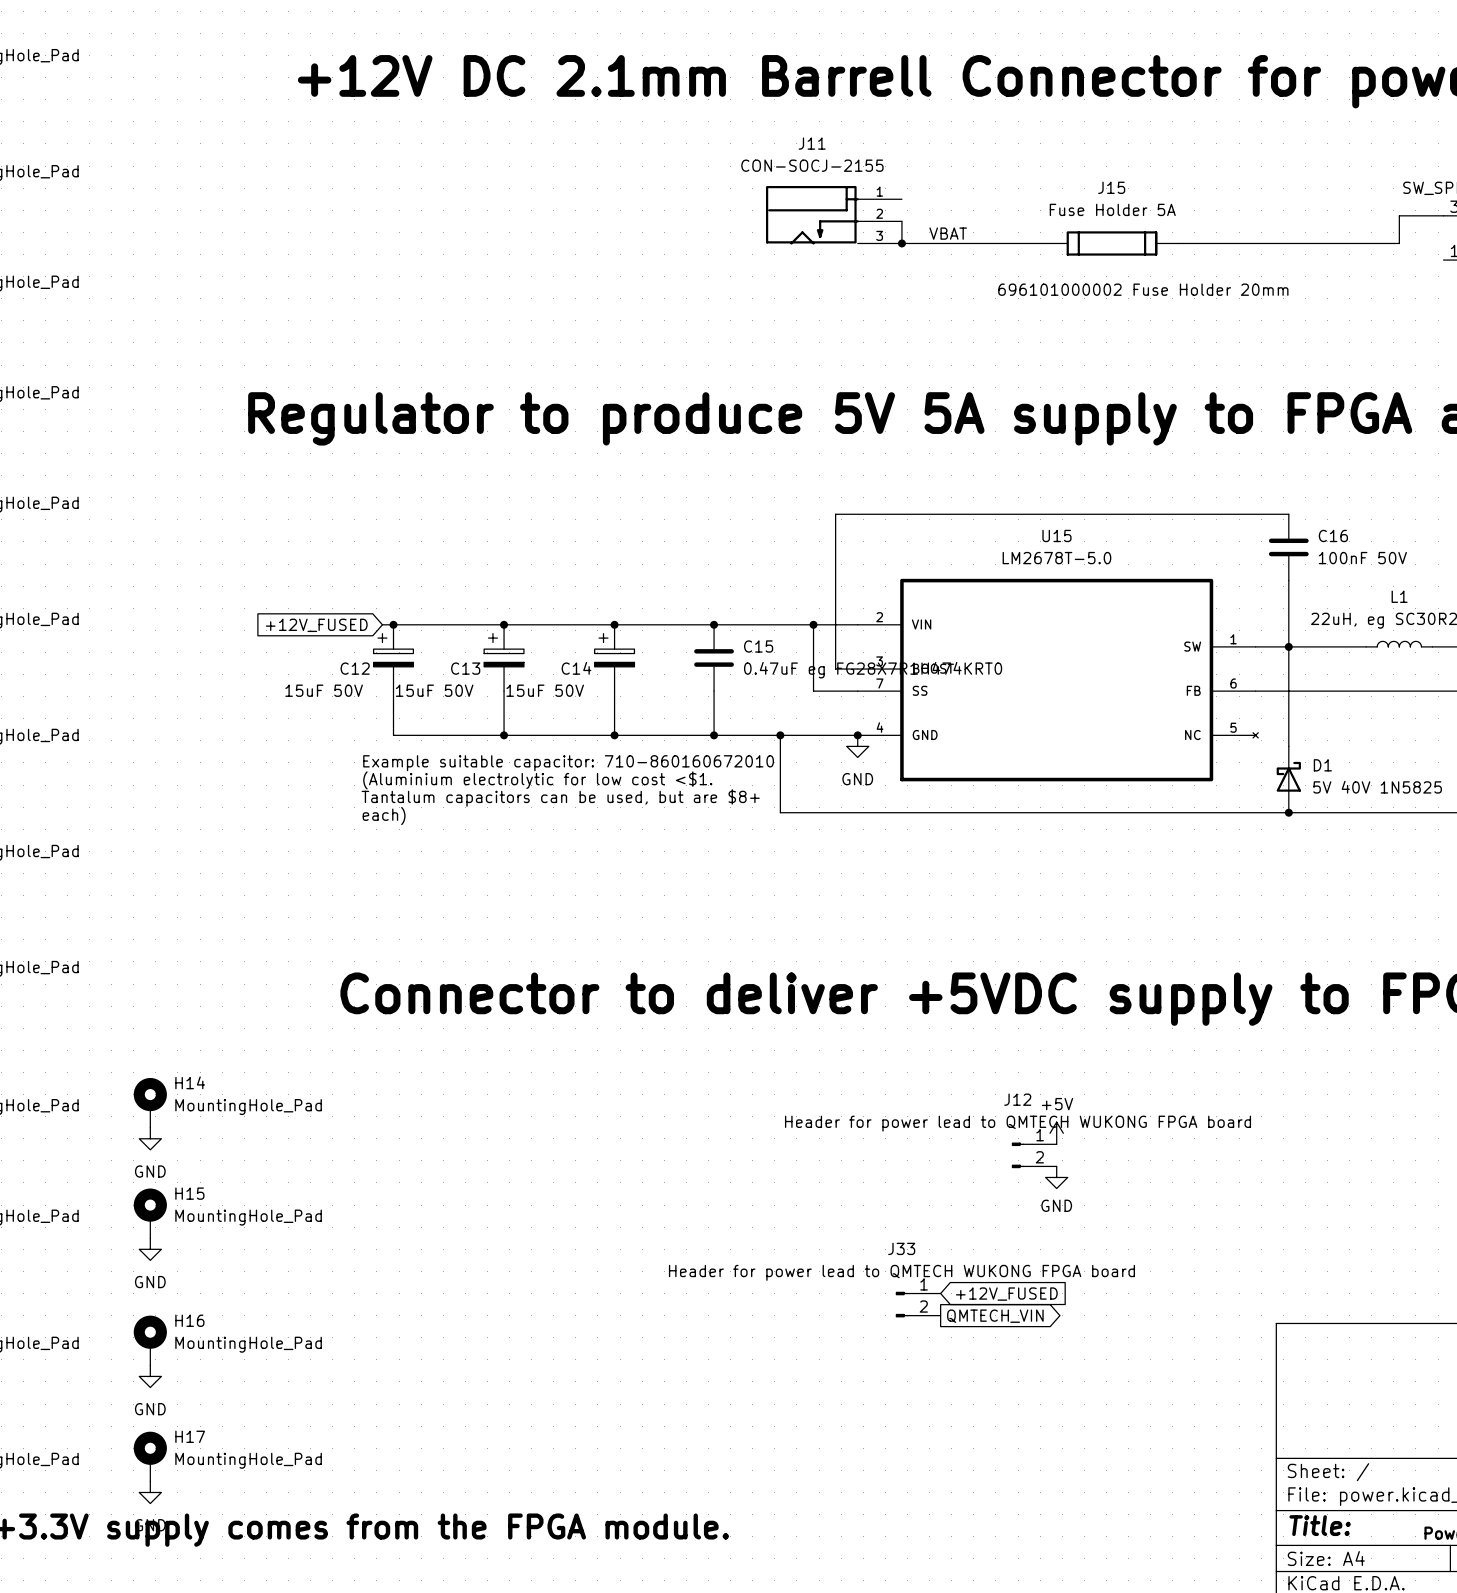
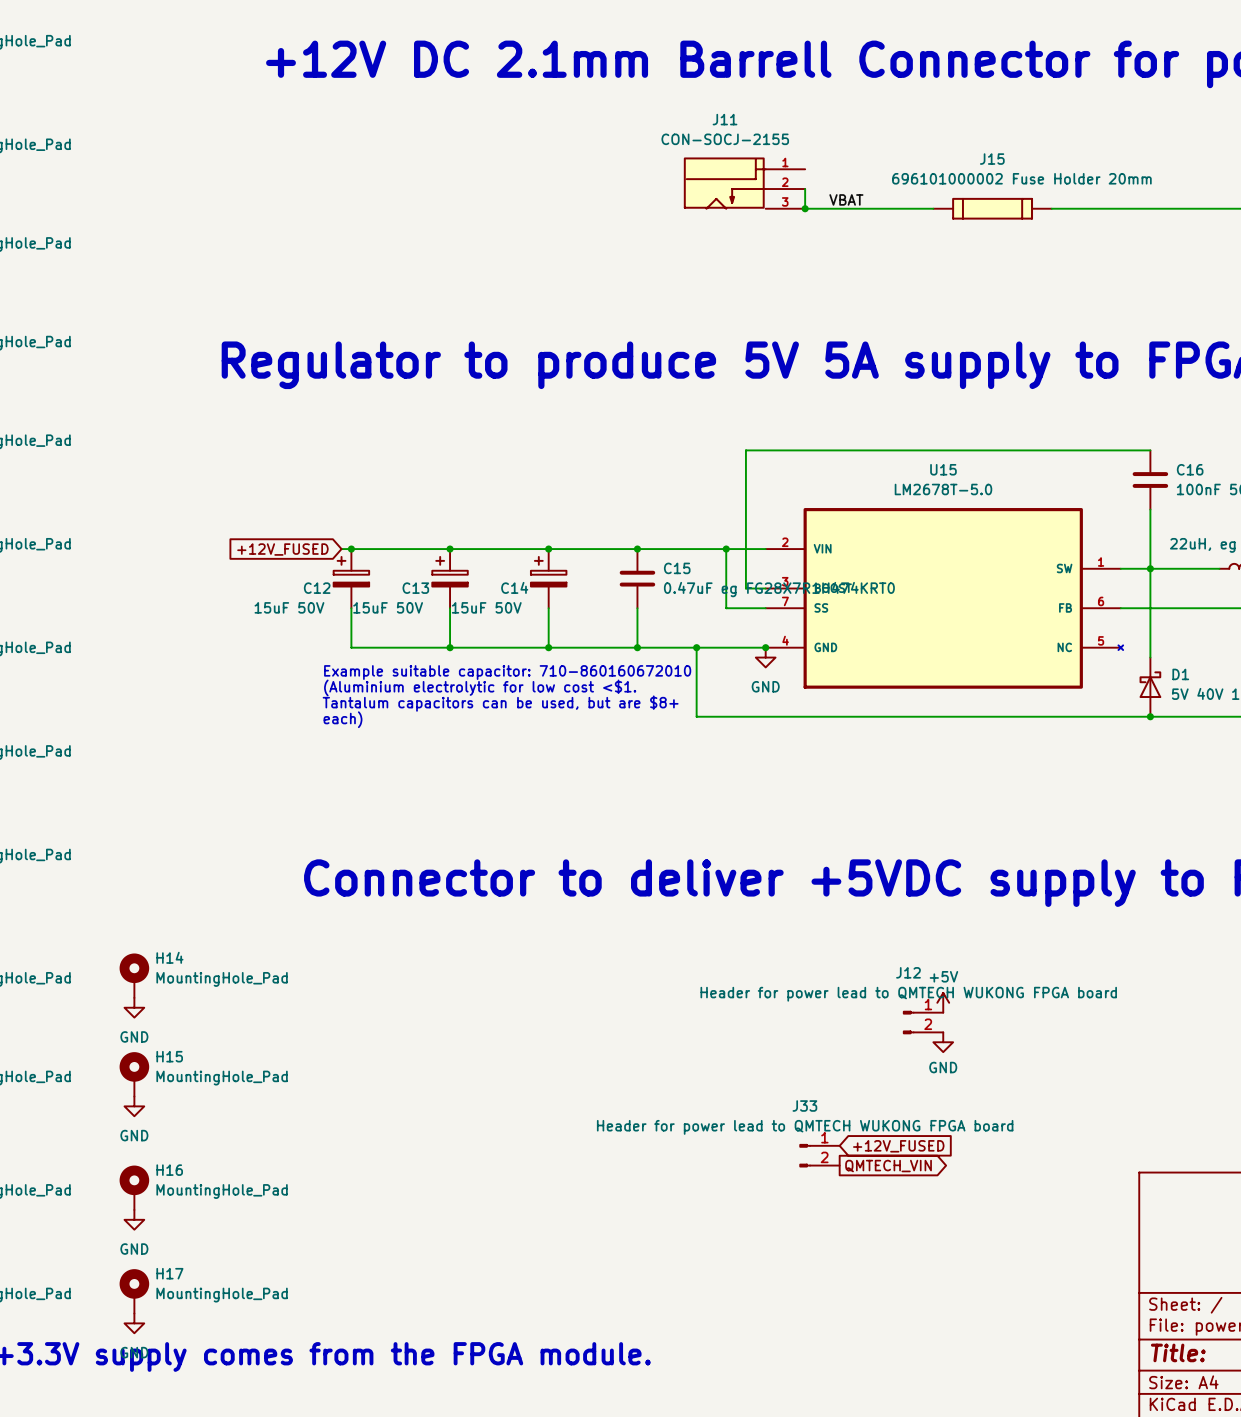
J15 value: Fuse Holder 5A (1112, 209) -> 696101000002 Fuse Holder 20mm (1021, 178)
text: 696101000002 Fuse Holder 20mm (1143, 289) -> none

